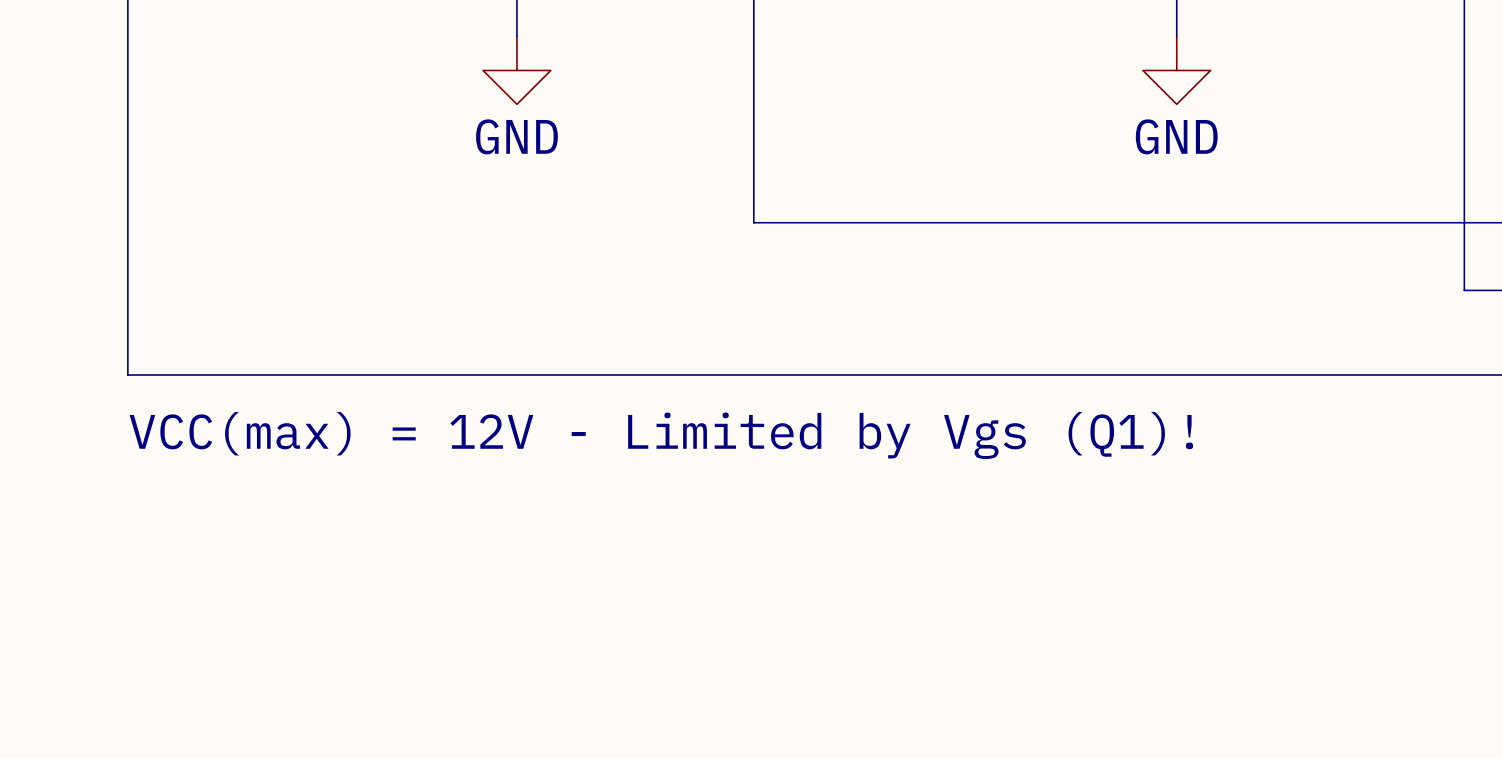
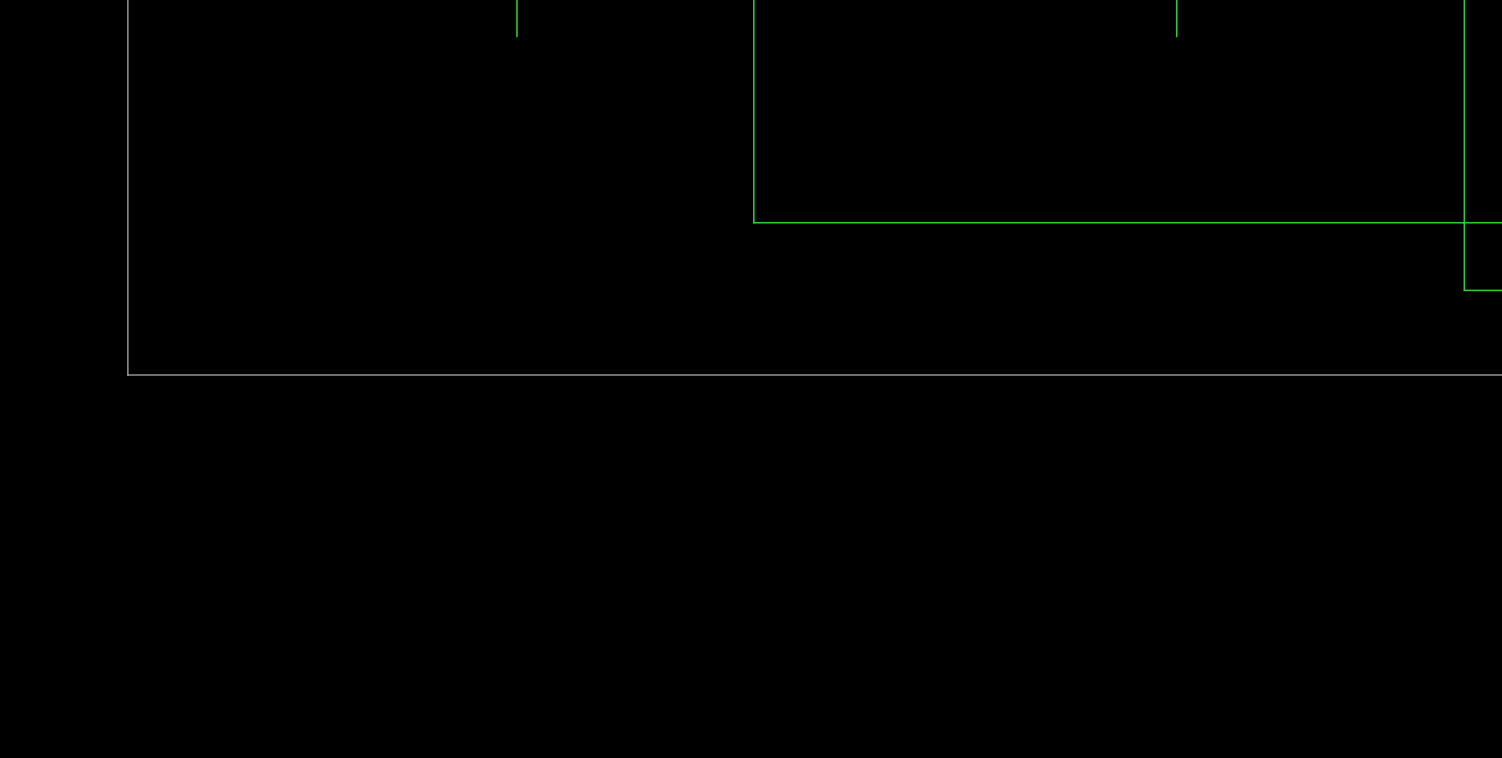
power symbol: GND (516, 70) -> none
power symbol: GND (1176, 70) -> none
text: VCC(max) = 12V - Limited by Vgs (Q1)! (661, 435) -> none

